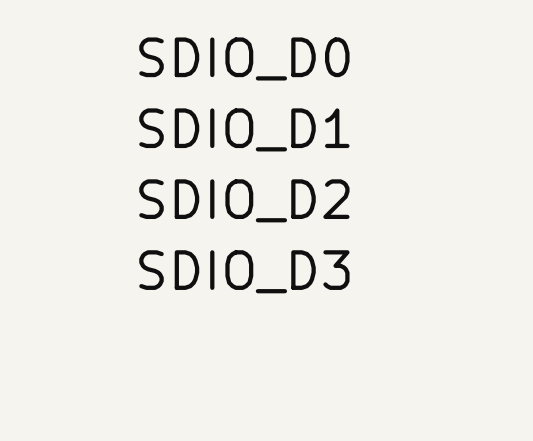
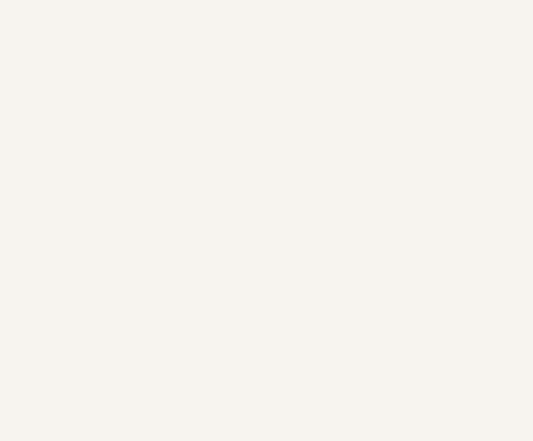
label: SDIO_D0 (244, 58) -> none
label: SDIO_D1 (244, 129) -> none
label: SDIO_D2 (244, 200) -> none
label: SDIO_D3 (244, 271) -> none

